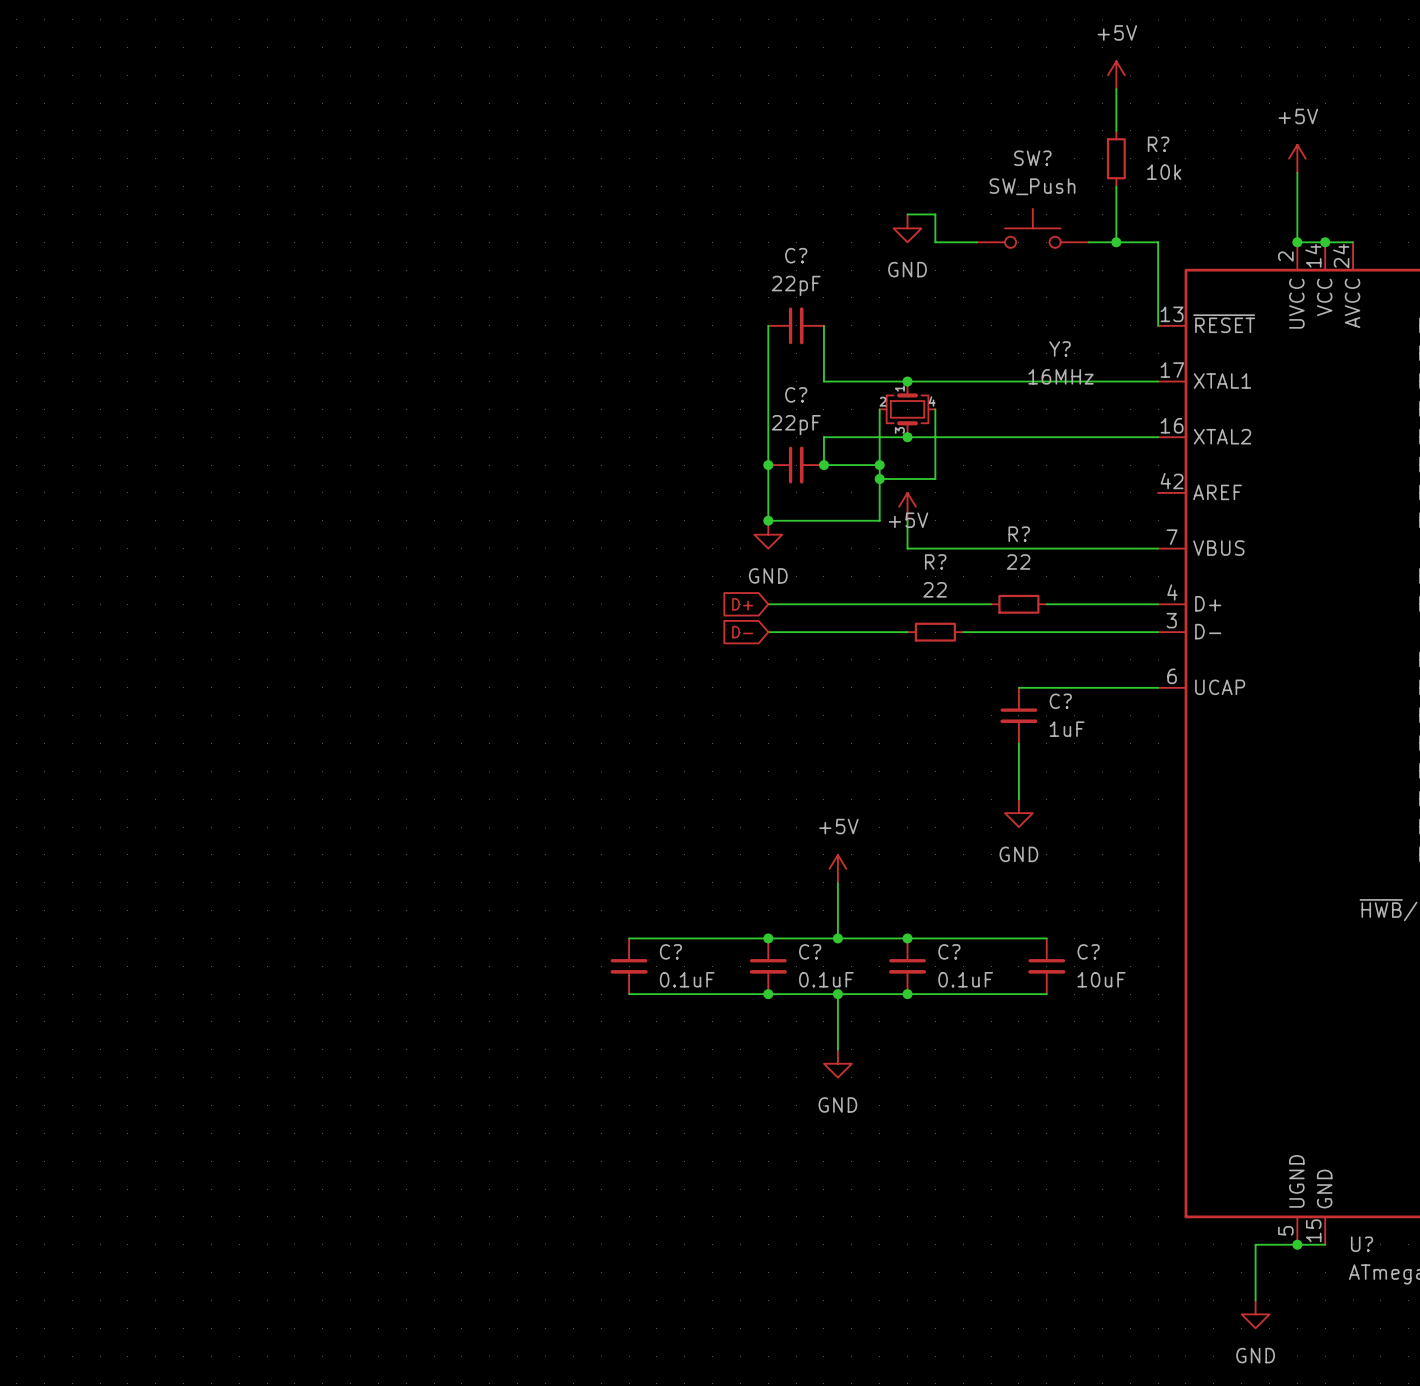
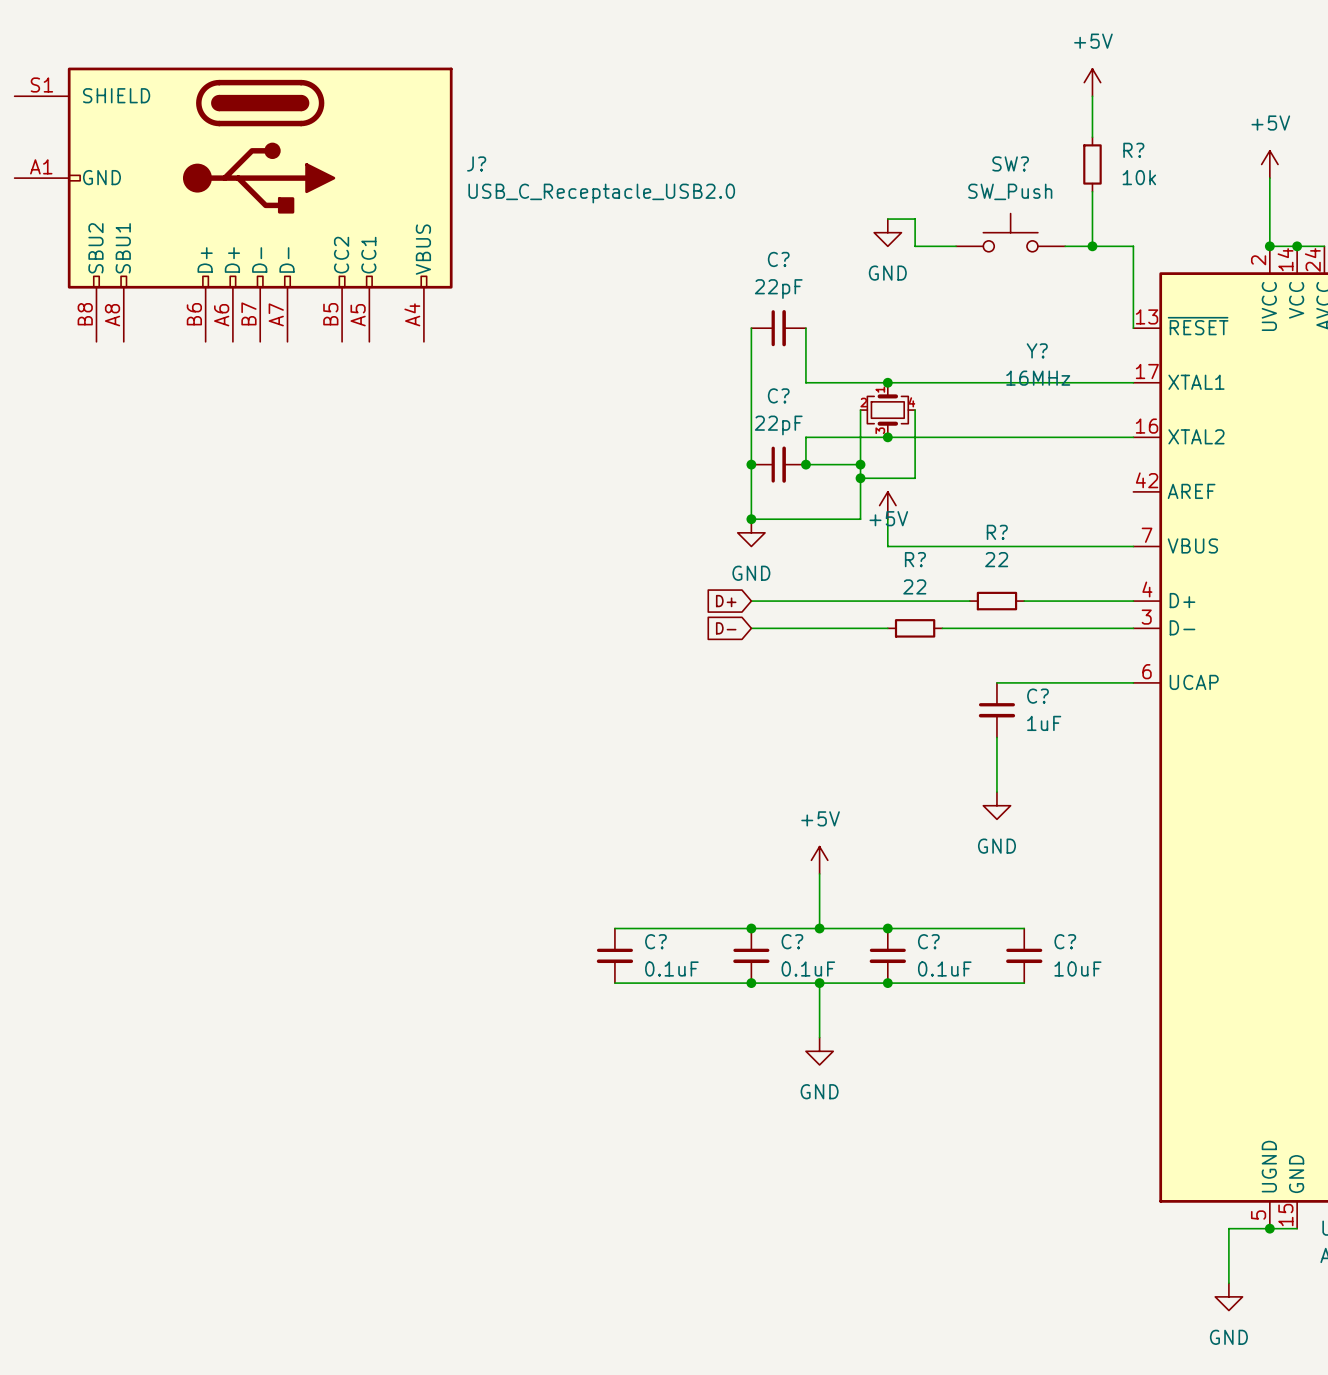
J?: none -> USB_C_Receptacle_USB2.0 (233, 204)

